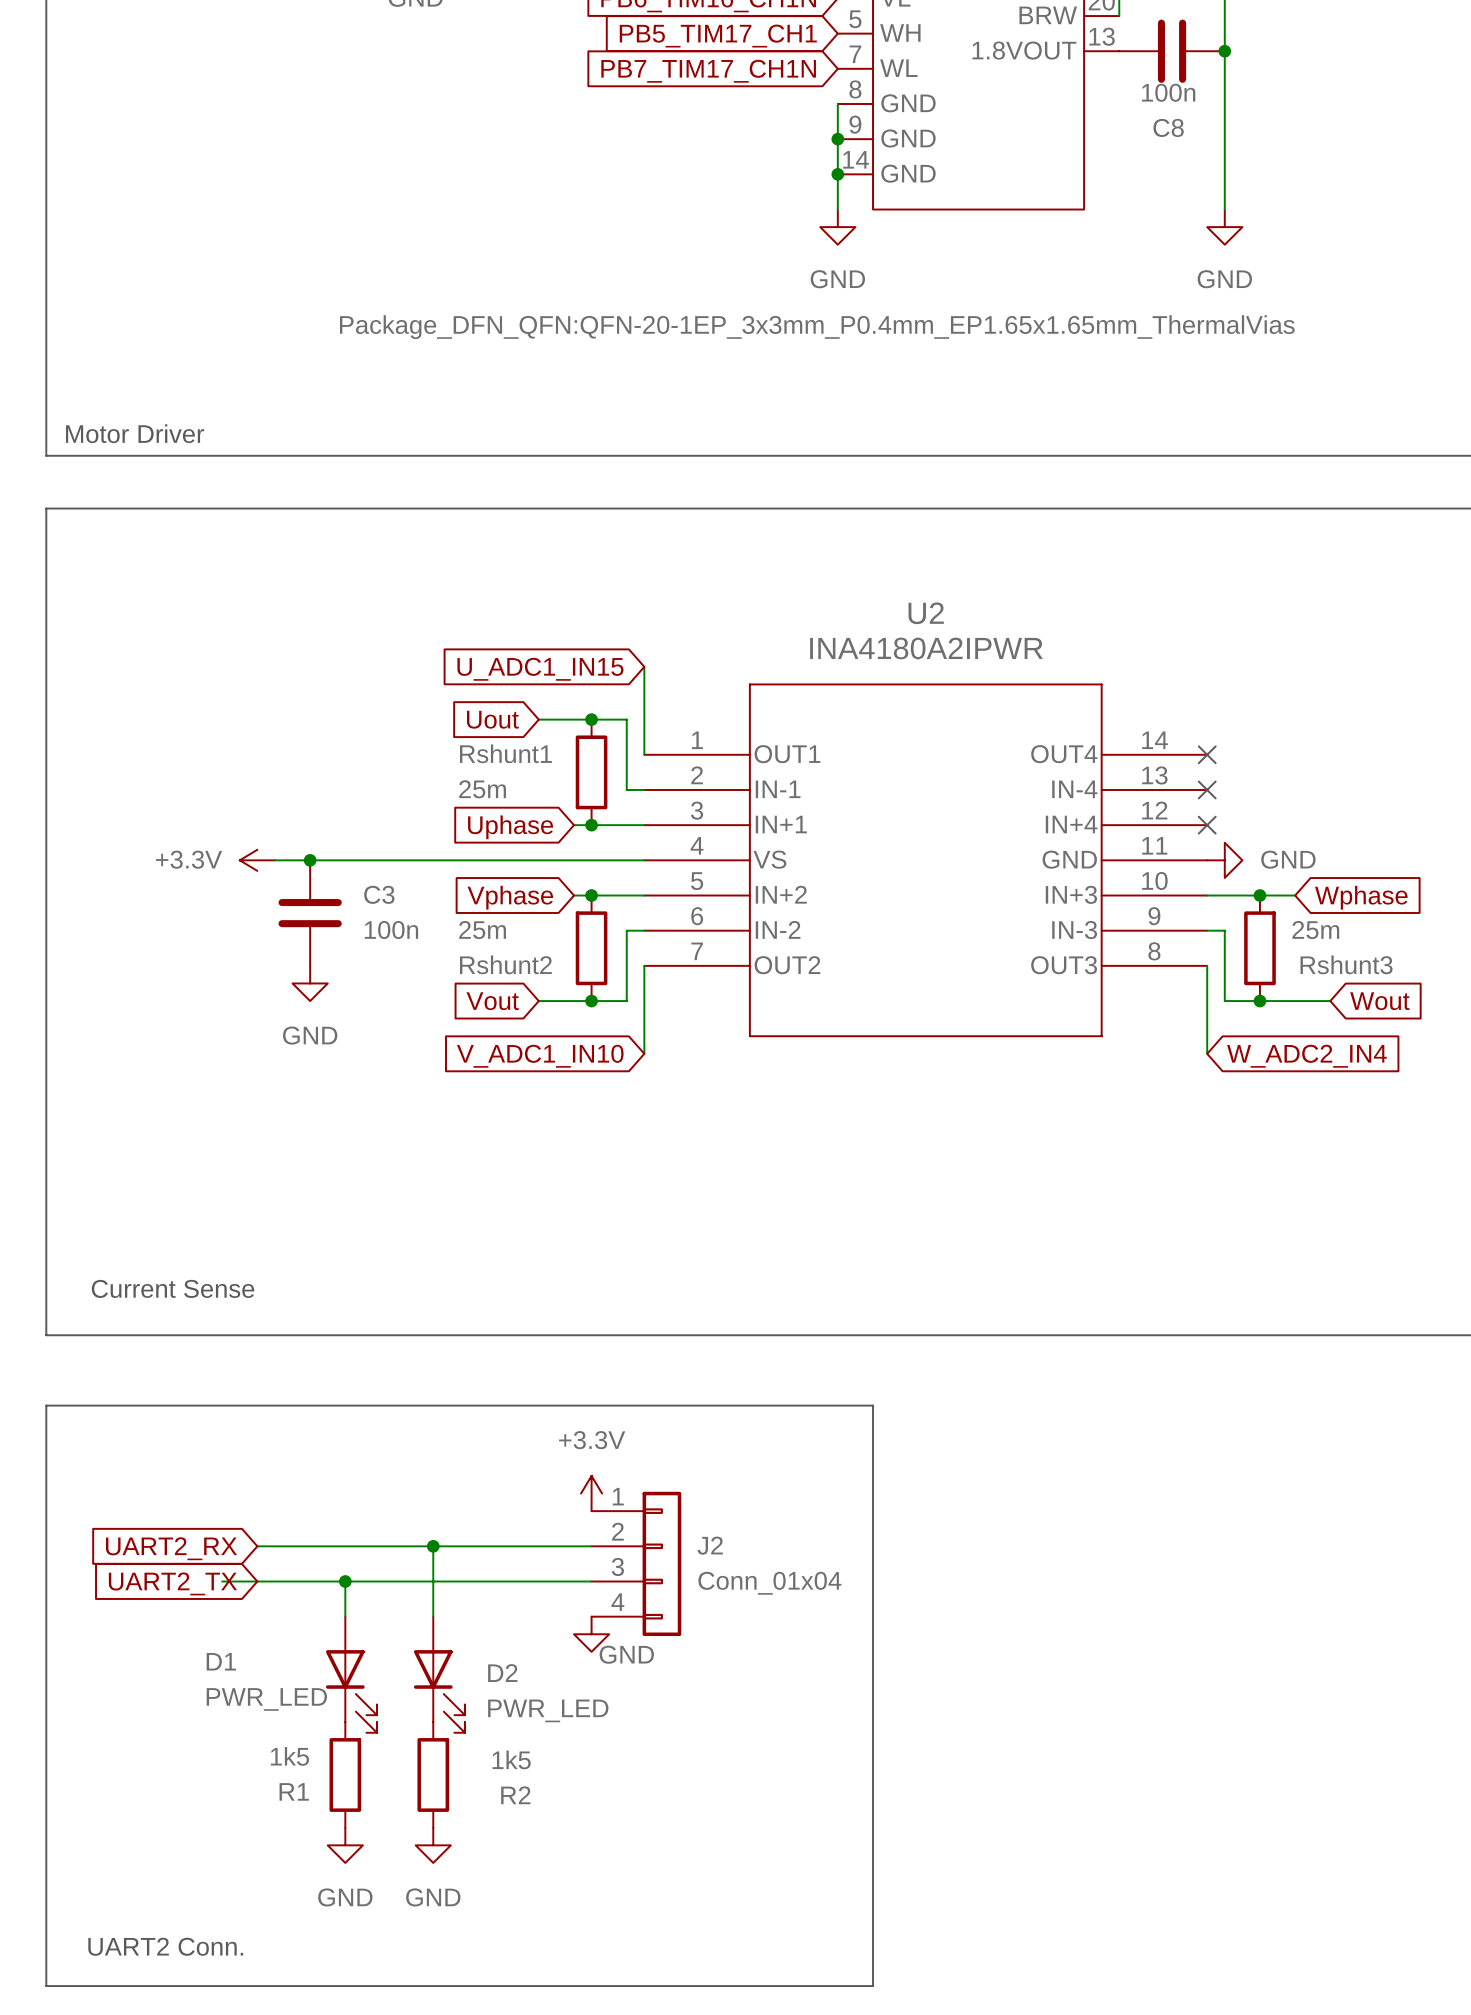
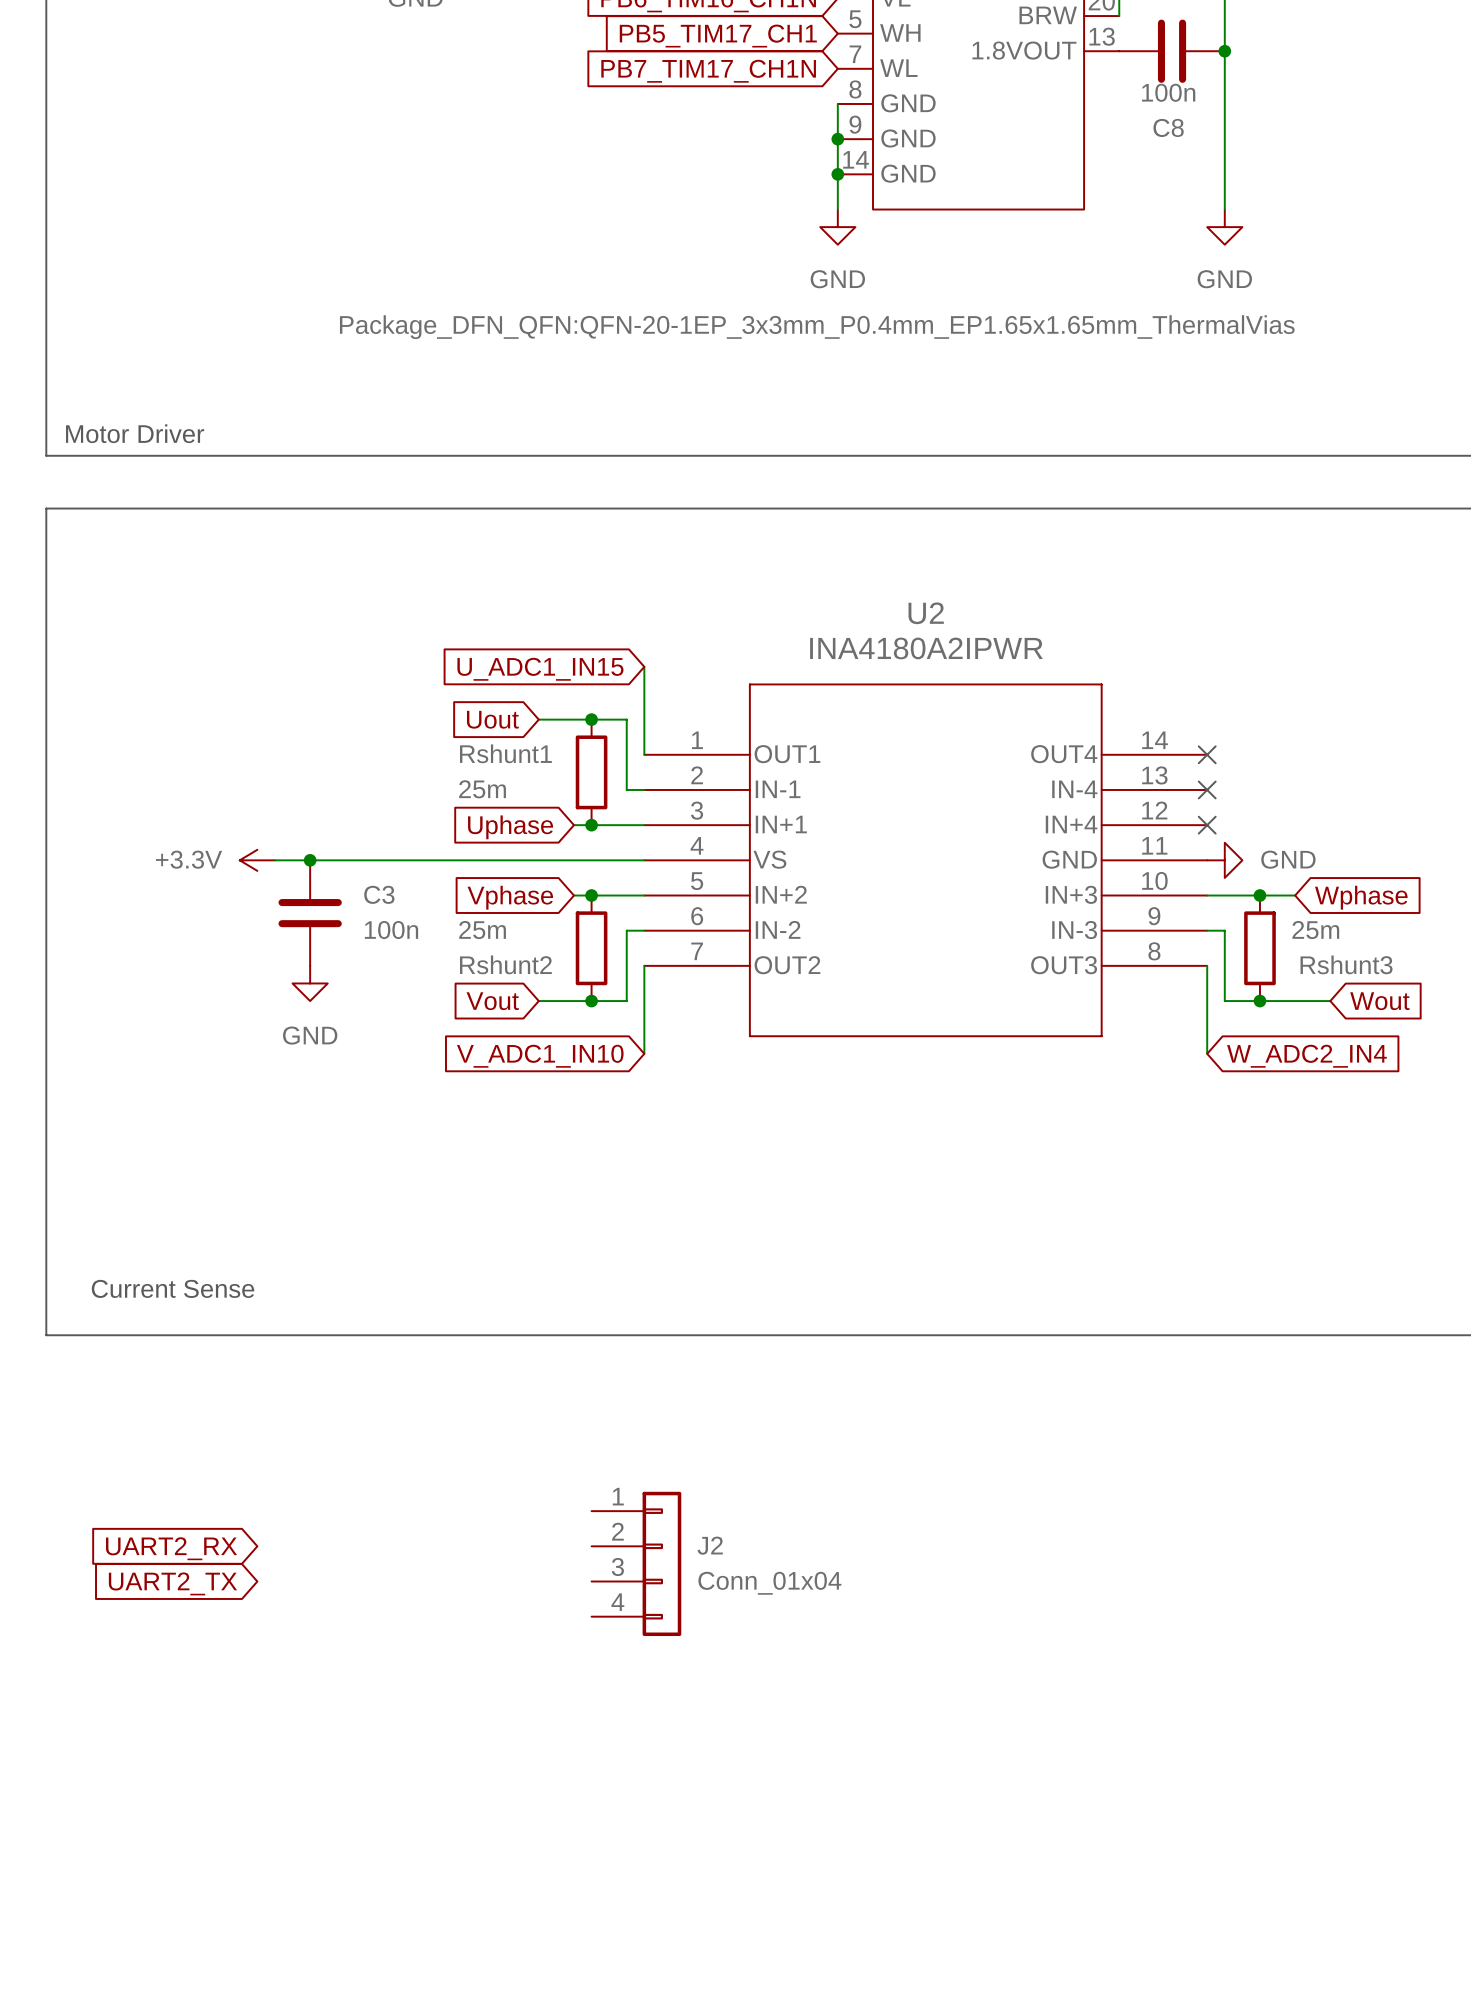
line: (46, 1405) (873, 1405) (873, 1986) (46, 1986) (46, 1405) -> none
power symbol: +3.3V (591, 1493) -> none
wire: (257, 1546) (591, 1546) -> none
wire: (433, 1546) (433, 1616) -> none
junction: (433, 1546) -> none
wire: (222, 1581) (591, 1581) -> none
wire: (345, 1581) (345, 1616) -> none
junction: (345, 1581) -> none
power symbol: GND (591, 1634) -> none
D1: PWR_LED (351, 1674) -> none
D2: PWR_LED (439, 1674) -> none
R1: 1k5 (345, 1774) -> none
R2: 1k5 (433, 1774) -> none
power symbol: GND (345, 1845) -> none
power symbol: GND (433, 1845) -> none
text: UART2 Conn. (165, 1946) -> none

